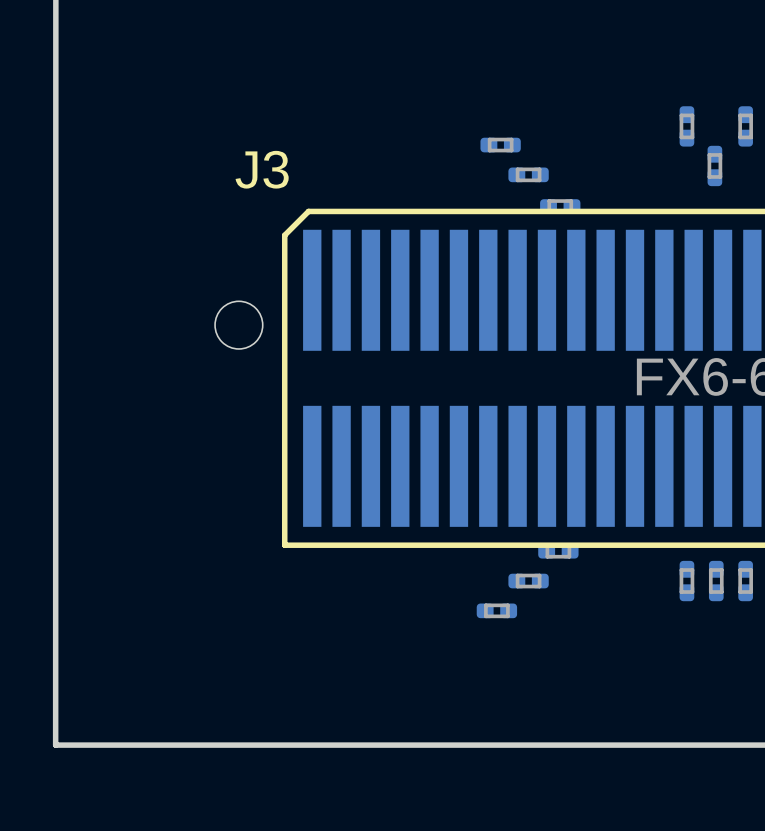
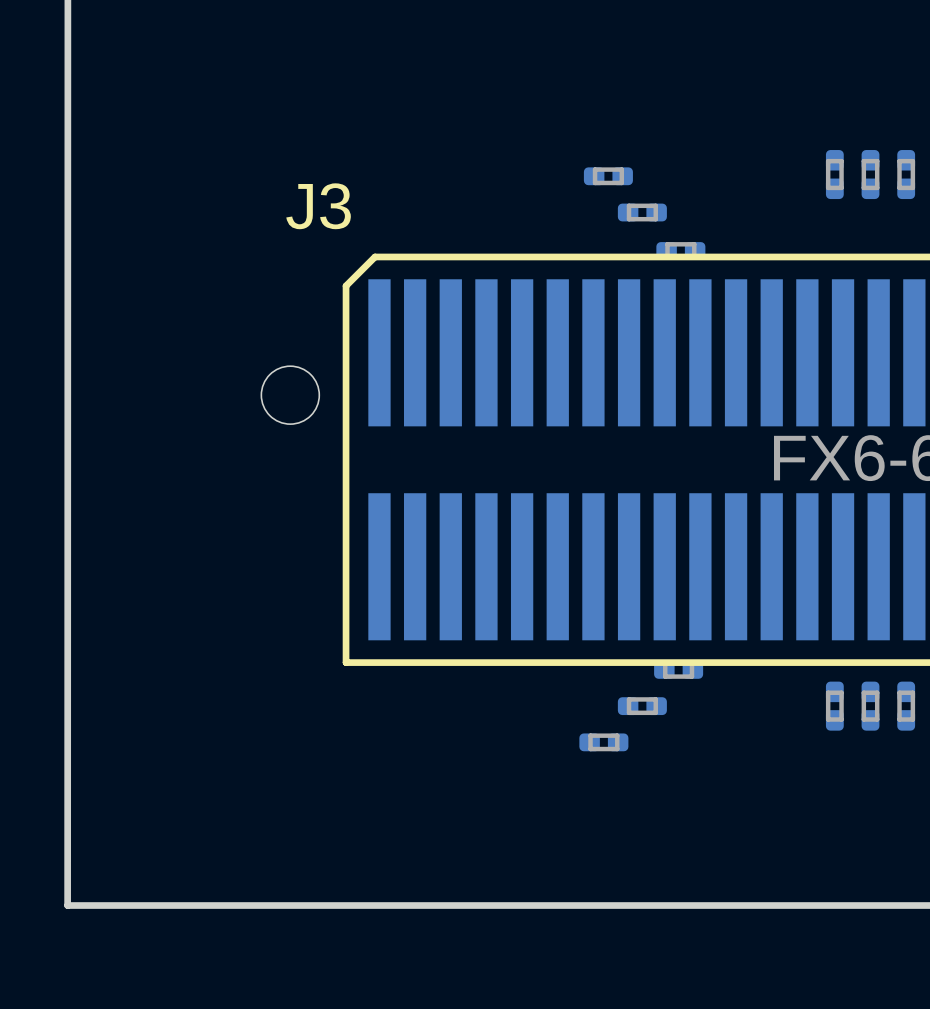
part: (686, 126) -> none
part: (745, 126) -> none
part: none -> (834, 174)
part: none -> (870, 174)
part: none -> (906, 174)
part: (714, 165) -> none

